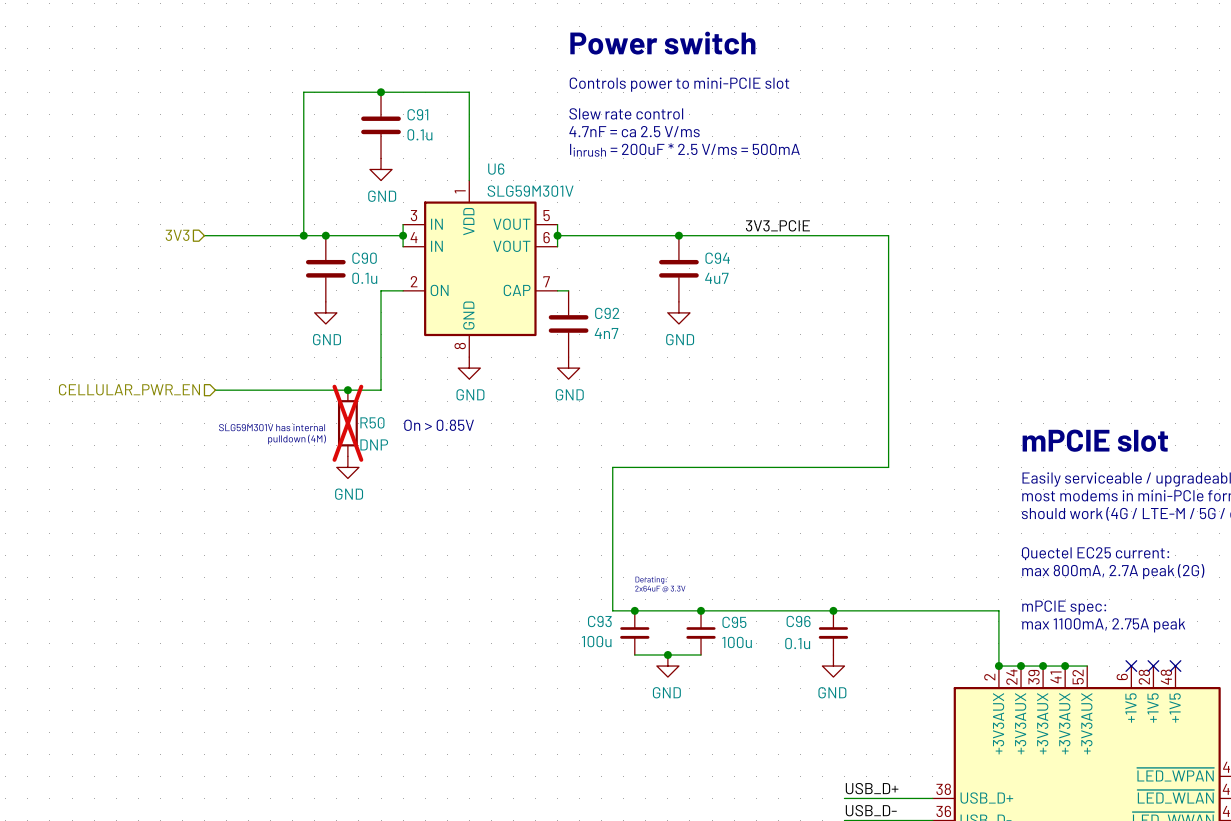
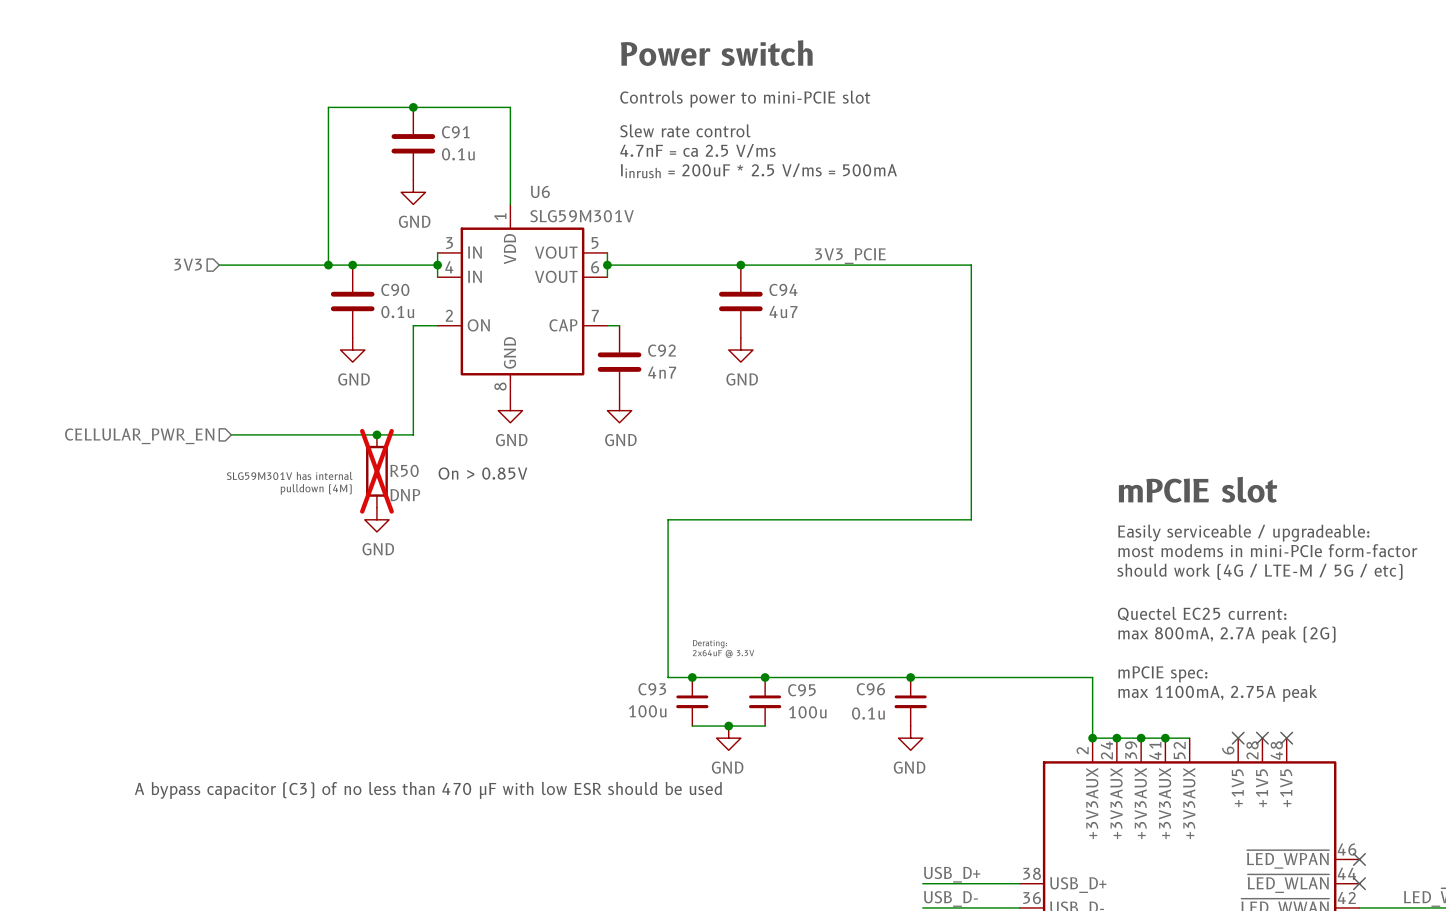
text: none -> A bypass capacitor (C3) of no less than 470 μF with low ESR should be used (428, 790)

